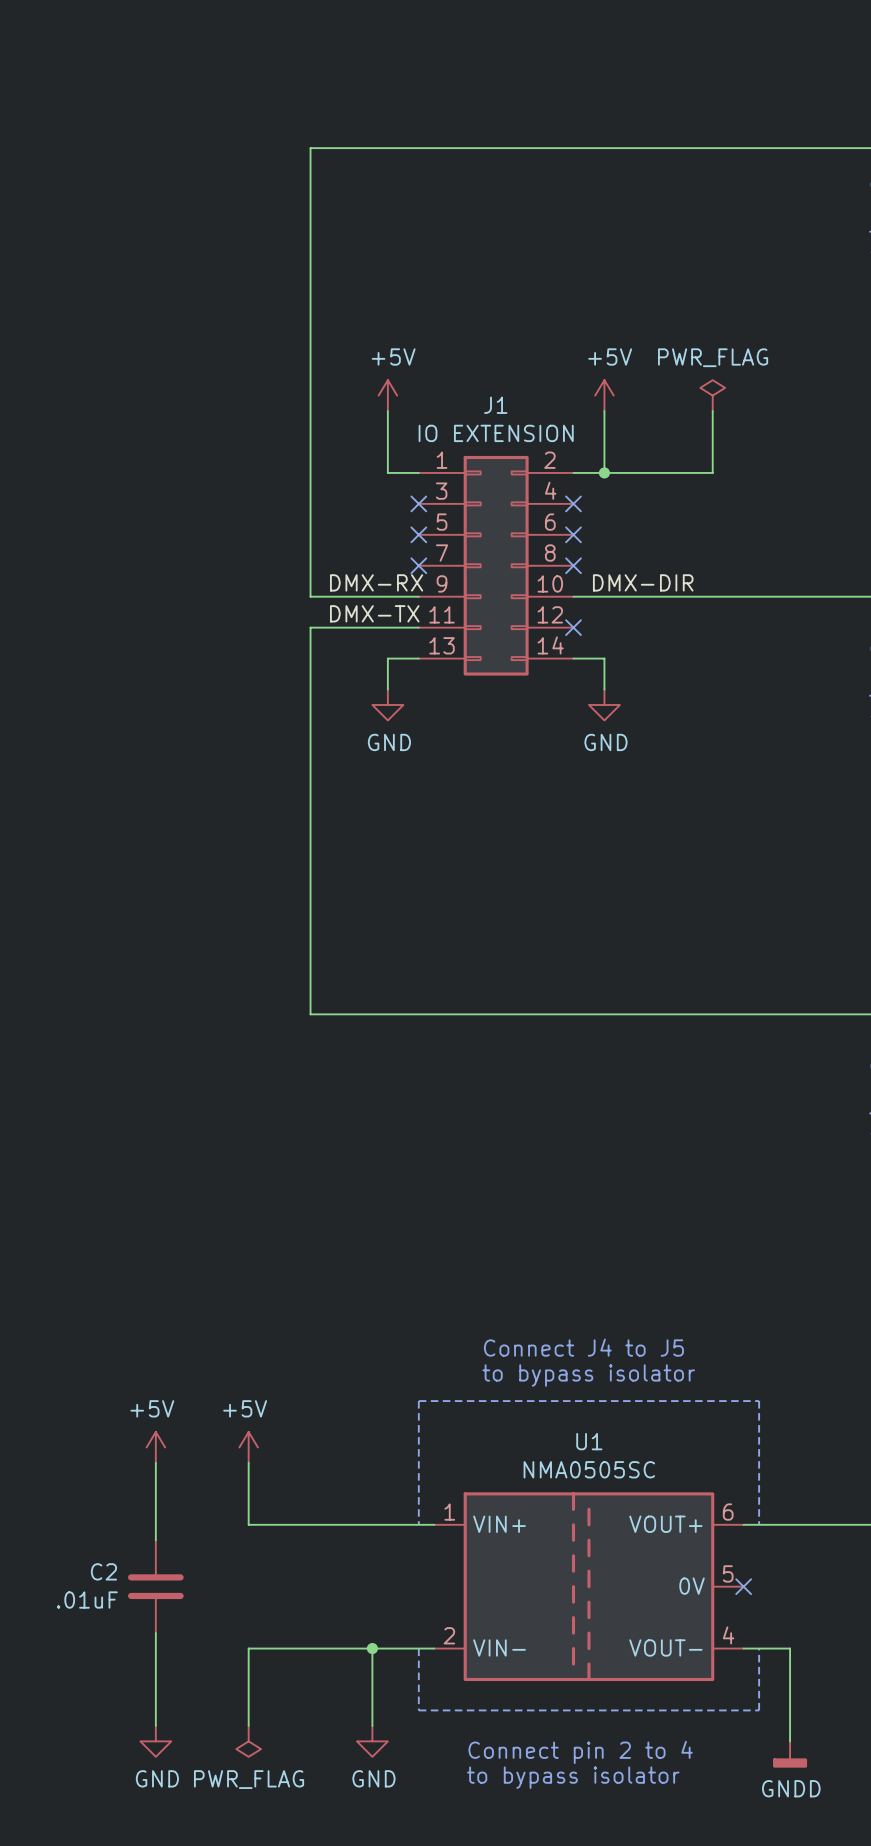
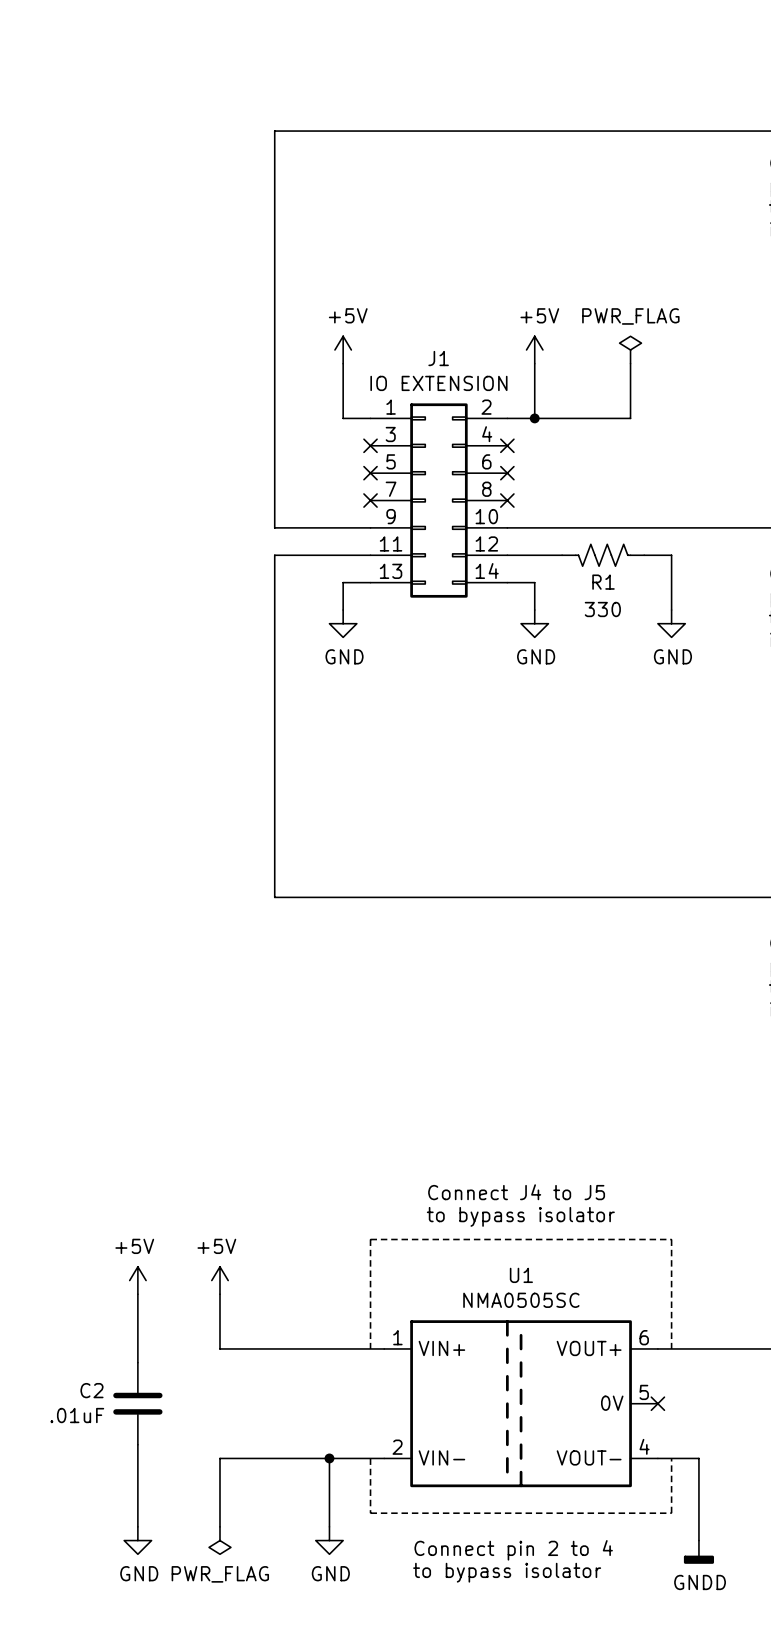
label: DMX-RX (376, 582) -> none
label: DMX-DIR (643, 582) -> none
label: DMX-TX (374, 613) -> none
wire: none -> (507, 555) (562, 555)
no-connect mark: (573, 627) -> none
R1: none -> 330 (603, 555)
wire: none -> (644, 555) (671, 555) (671, 610)
power symbol: none -> GND (671, 623)

